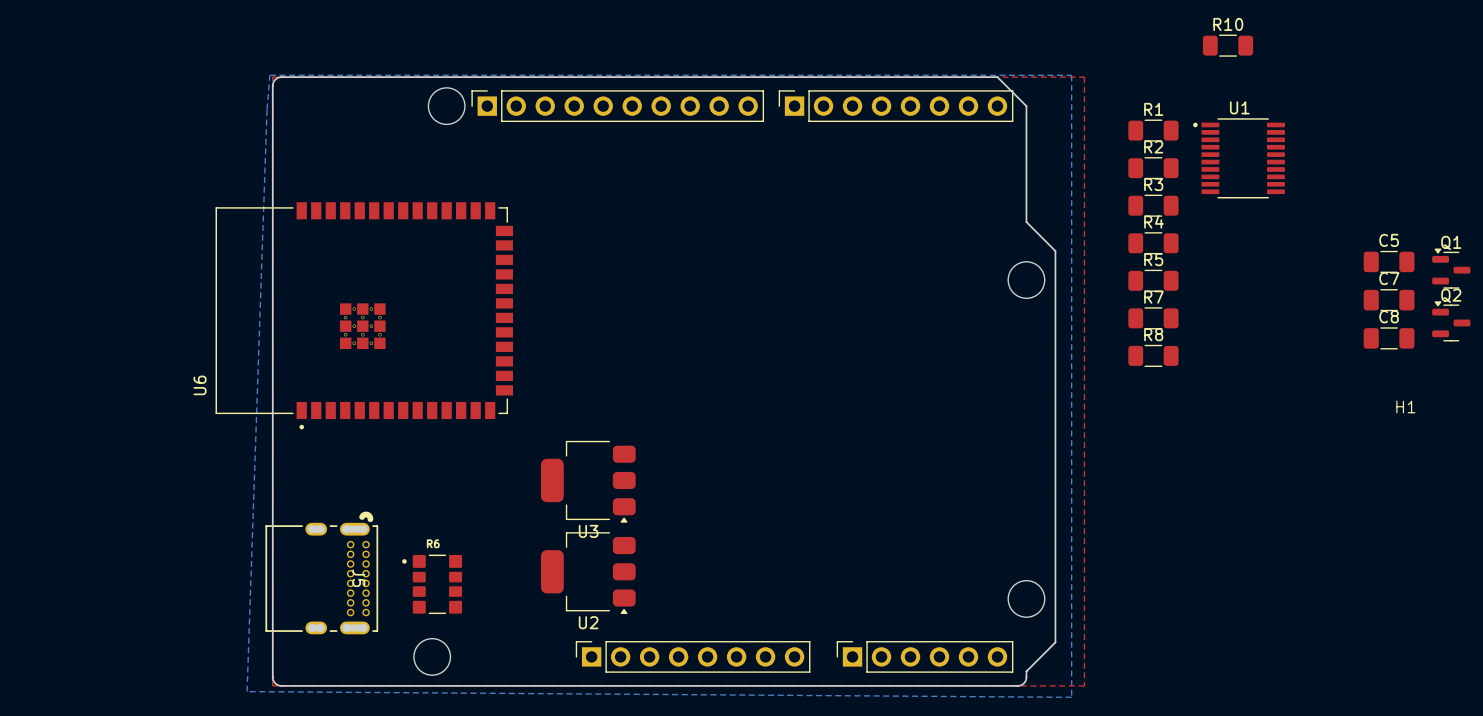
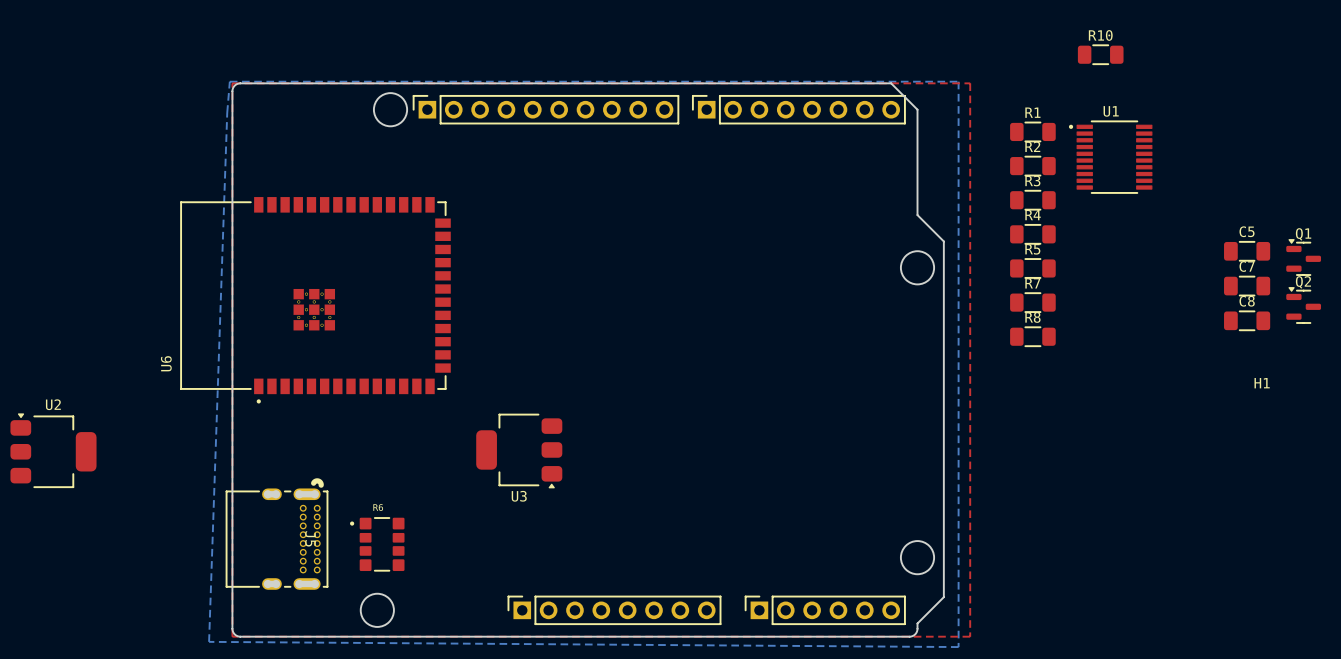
U2 rotation: 0° (588, 573) -> 180° (53, 450)
U2 position: (588, 573) -> (53, 450)

